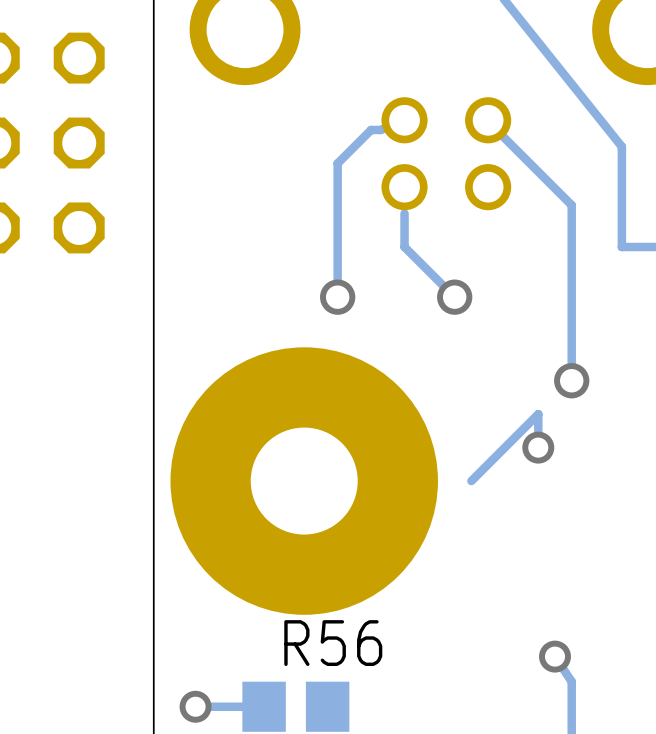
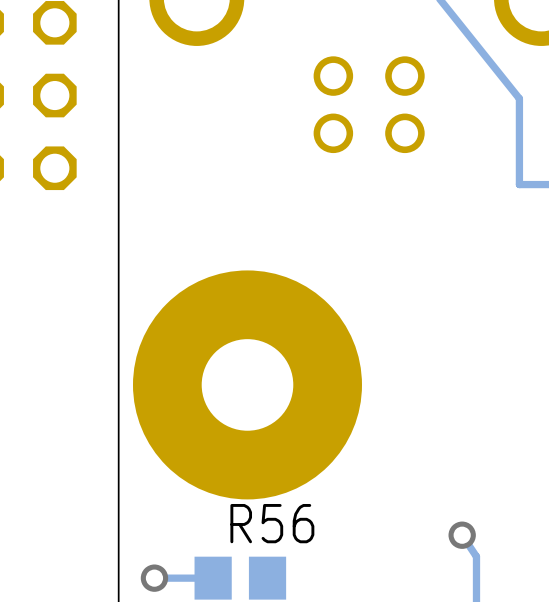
track: (404, 120) (380, 129) (371, 129) (337, 163) (337, 297) -> none
track: (488, 121) (571, 205) (571, 380) -> none
track: (404, 213) (404, 247) (454, 297) -> none
via: (337, 297) -> none
via: (454, 297) -> none
via: (571, 380) -> none
track: (538, 447) (538, 414) (471, 481) -> none
via: (538, 447) -> none

